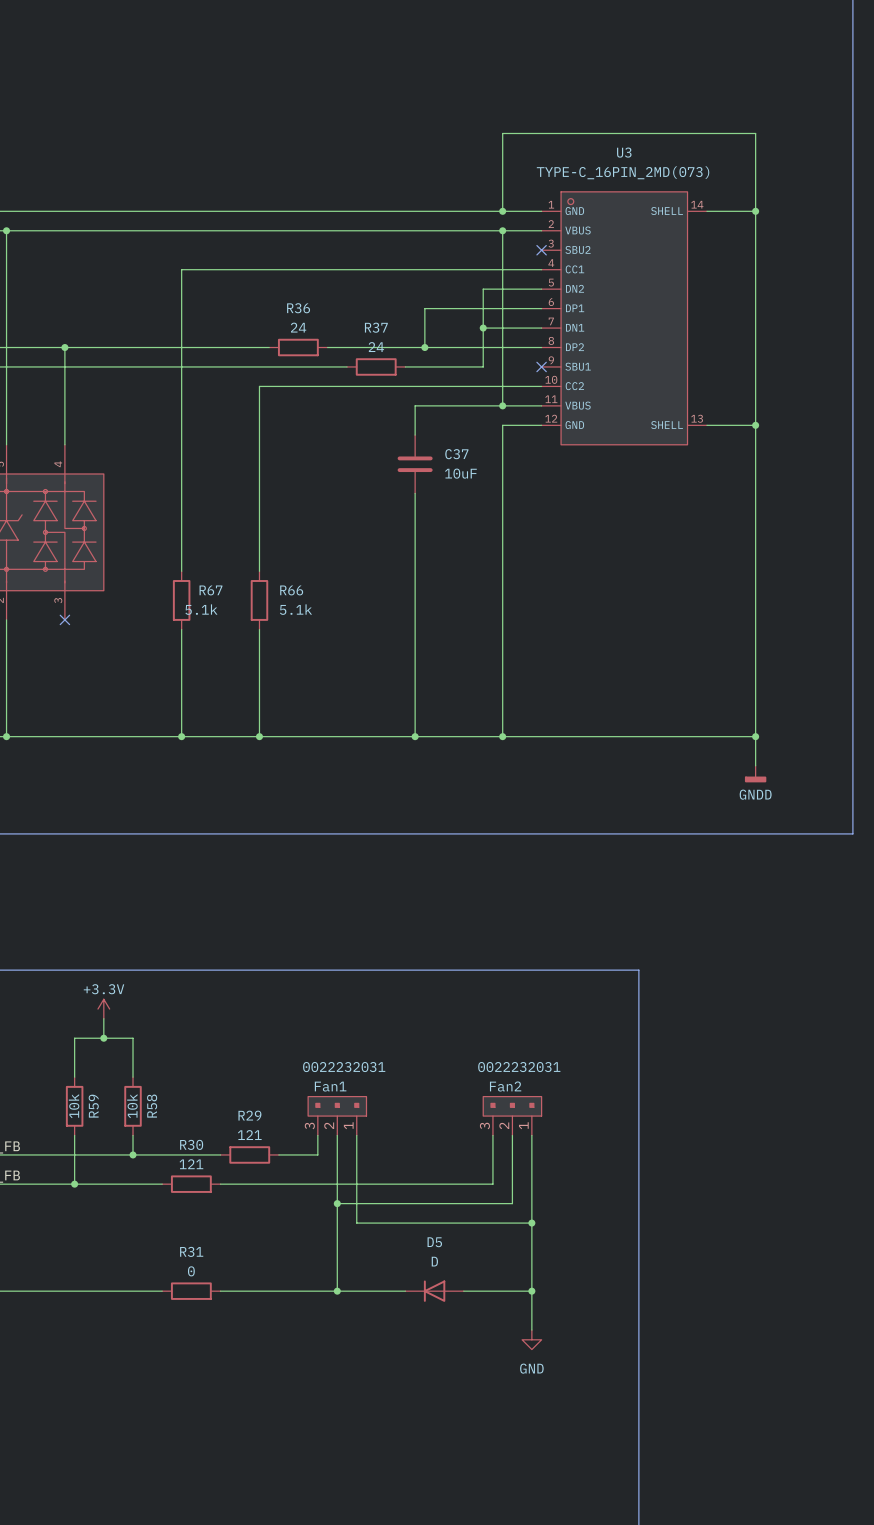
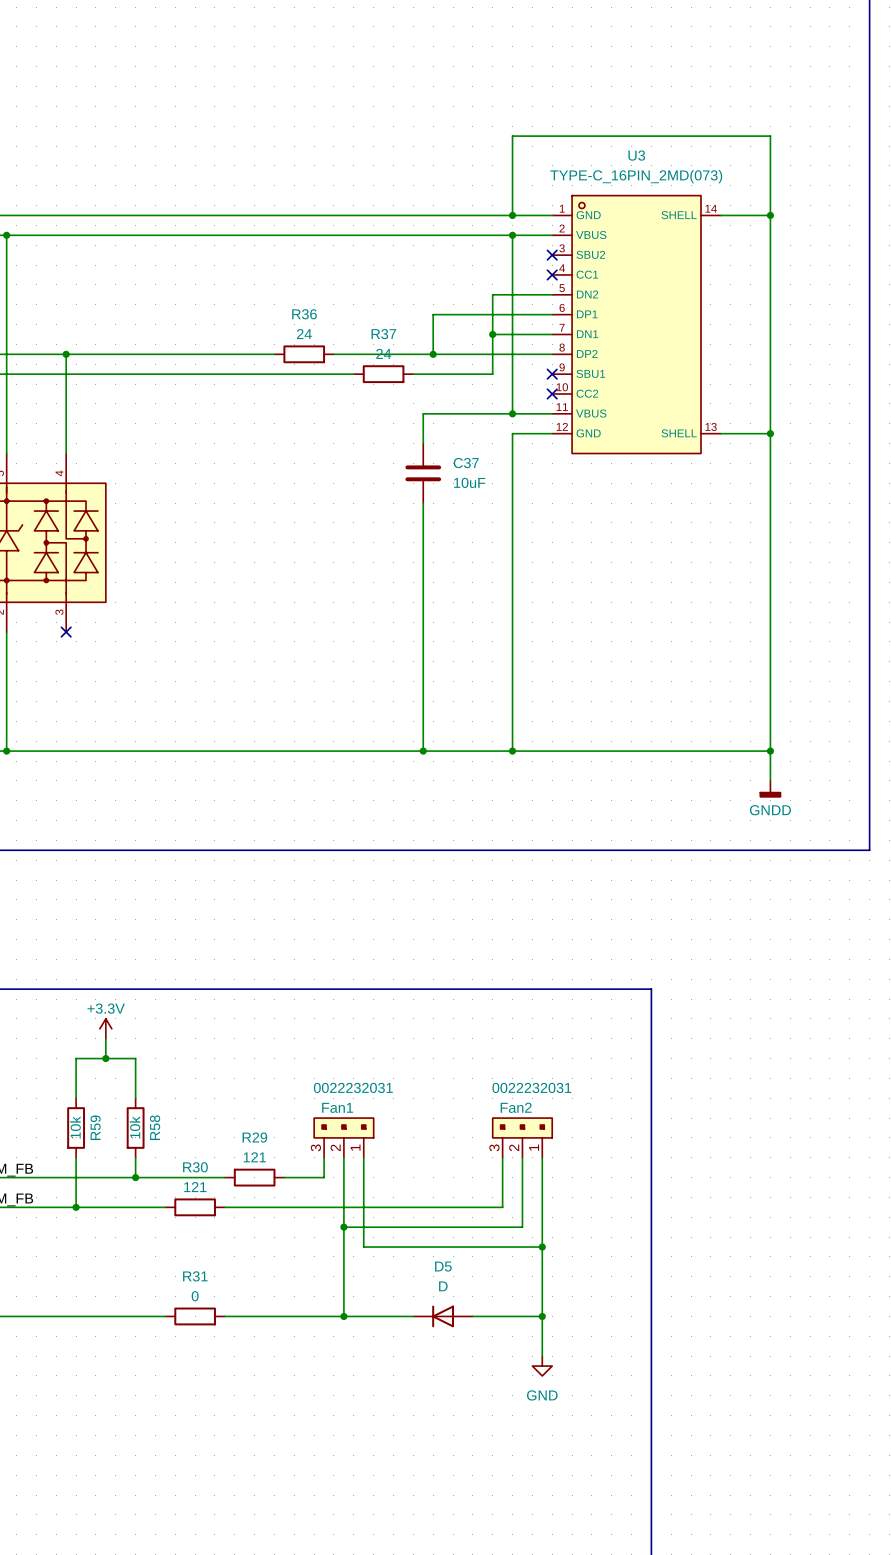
wire: (541, 269) (181, 269) (181, 571) -> none
no-connect mark: none -> (552, 274)
wire: (541, 386) (259, 386) (259, 571) -> none
no-connect mark: none -> (552, 393)
R67: 5.1k (181, 600) -> none
R66: 5.1k (259, 600) -> none
wire: (181, 629) (181, 736) -> none
wire: (259, 629) (259, 736) -> none
junction: (181, 736) -> none
junction: (259, 736) -> none

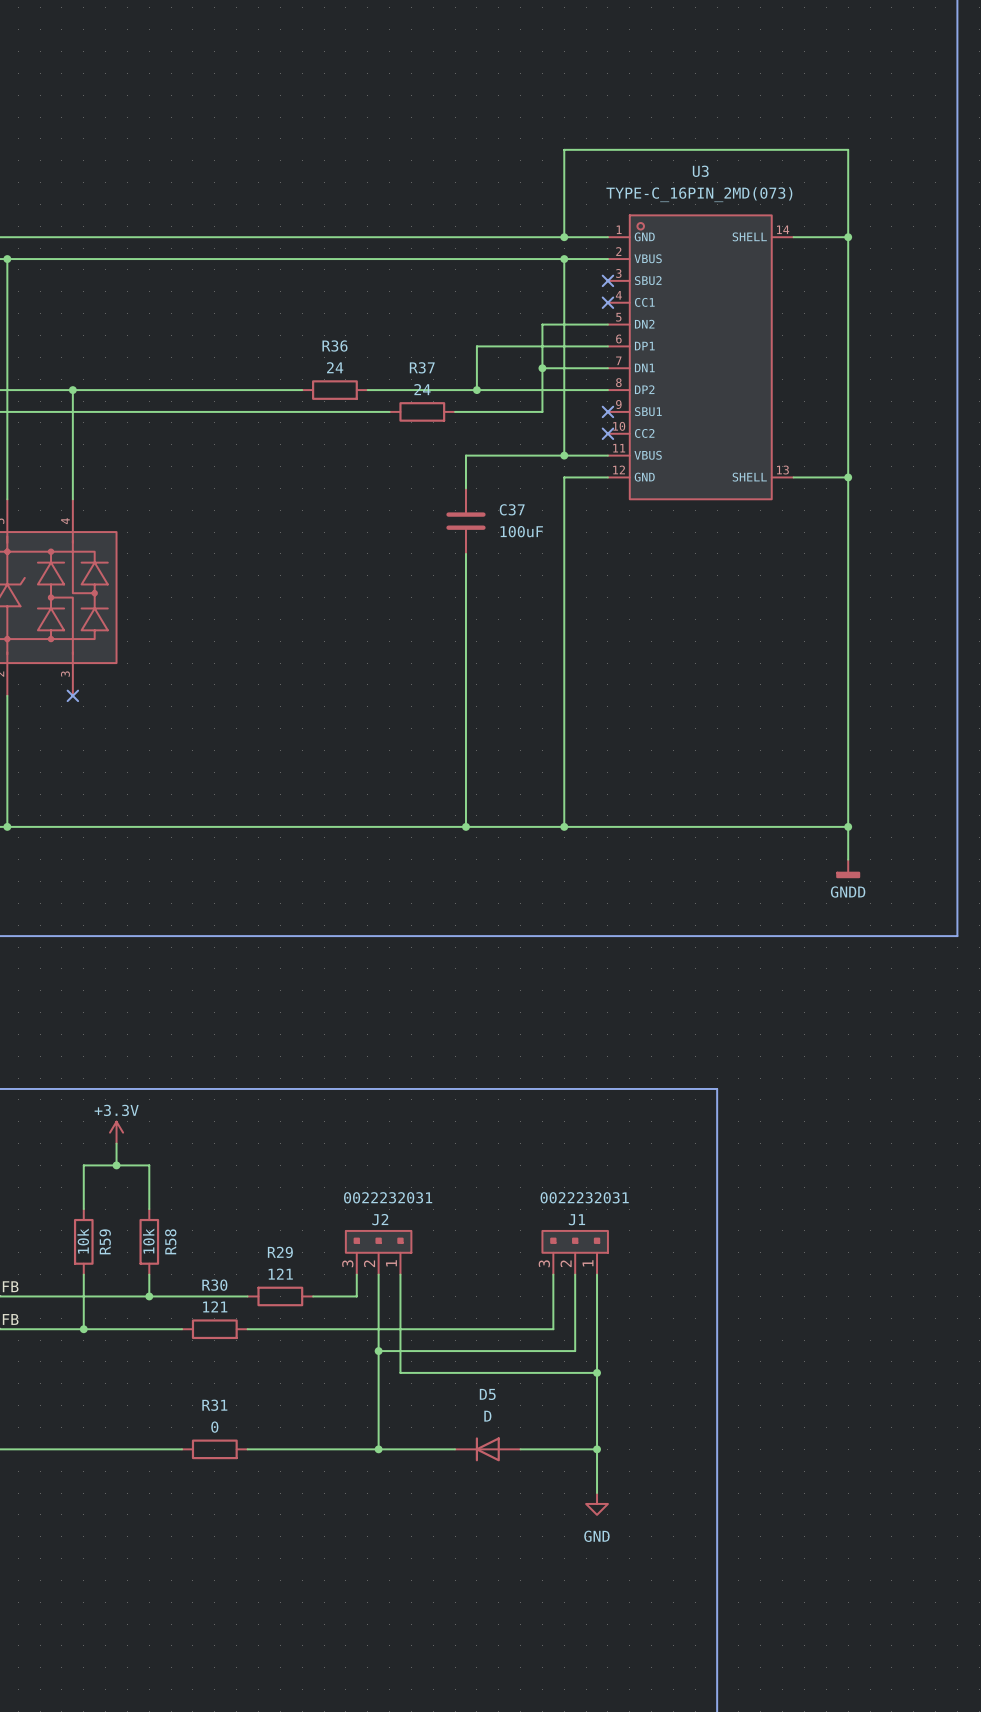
C37 value: 10uF (469, 482) -> 100uF (521, 531)
Fan1 name: Fan1 (337, 1107) -> J2 (380, 1219)
Fan2 name: Fan2 (516, 1107) -> J1 (576, 1219)

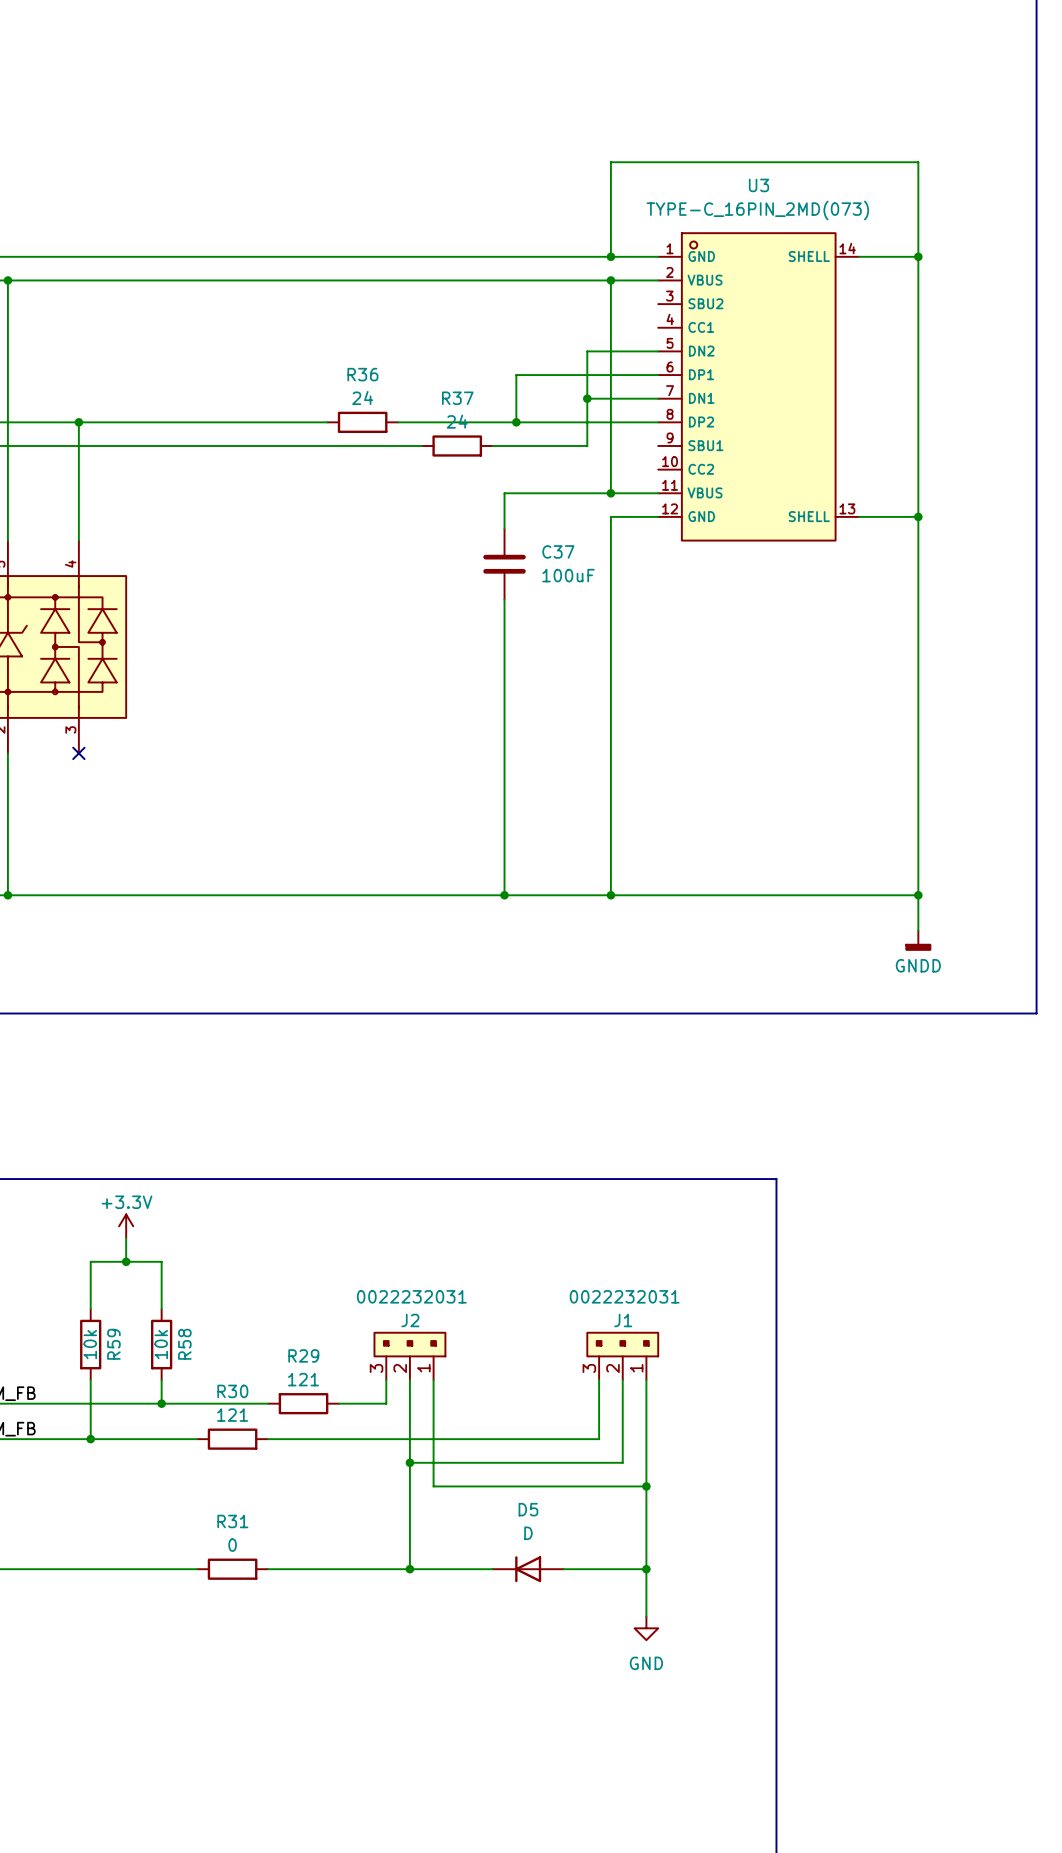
no-connect mark: (607, 280) -> none
no-connect mark: (607, 302) -> none
no-connect mark: (607, 411) -> none
no-connect mark: (607, 433) -> none

